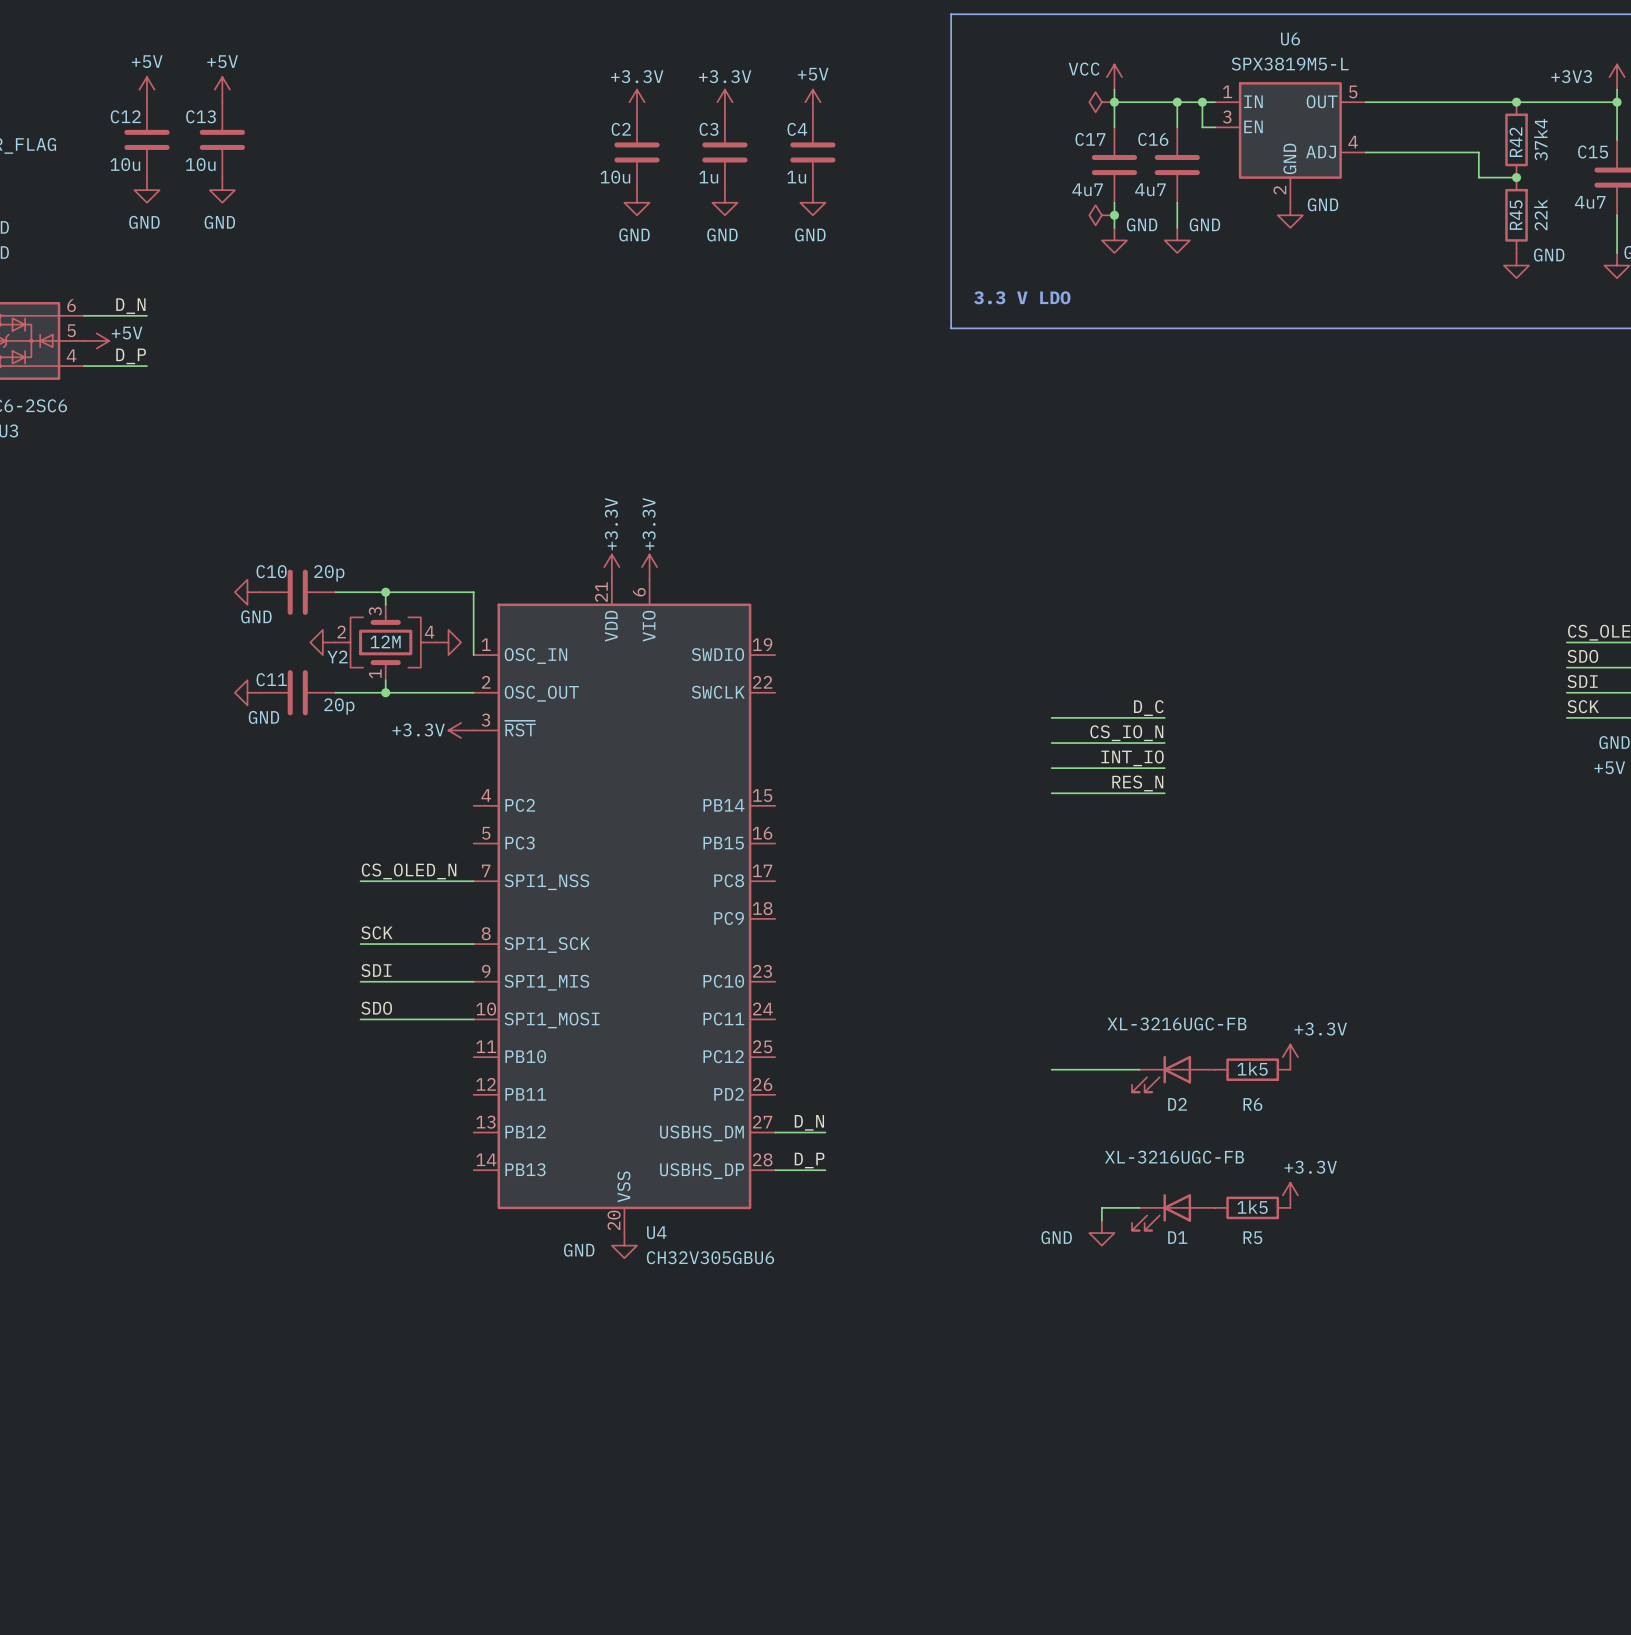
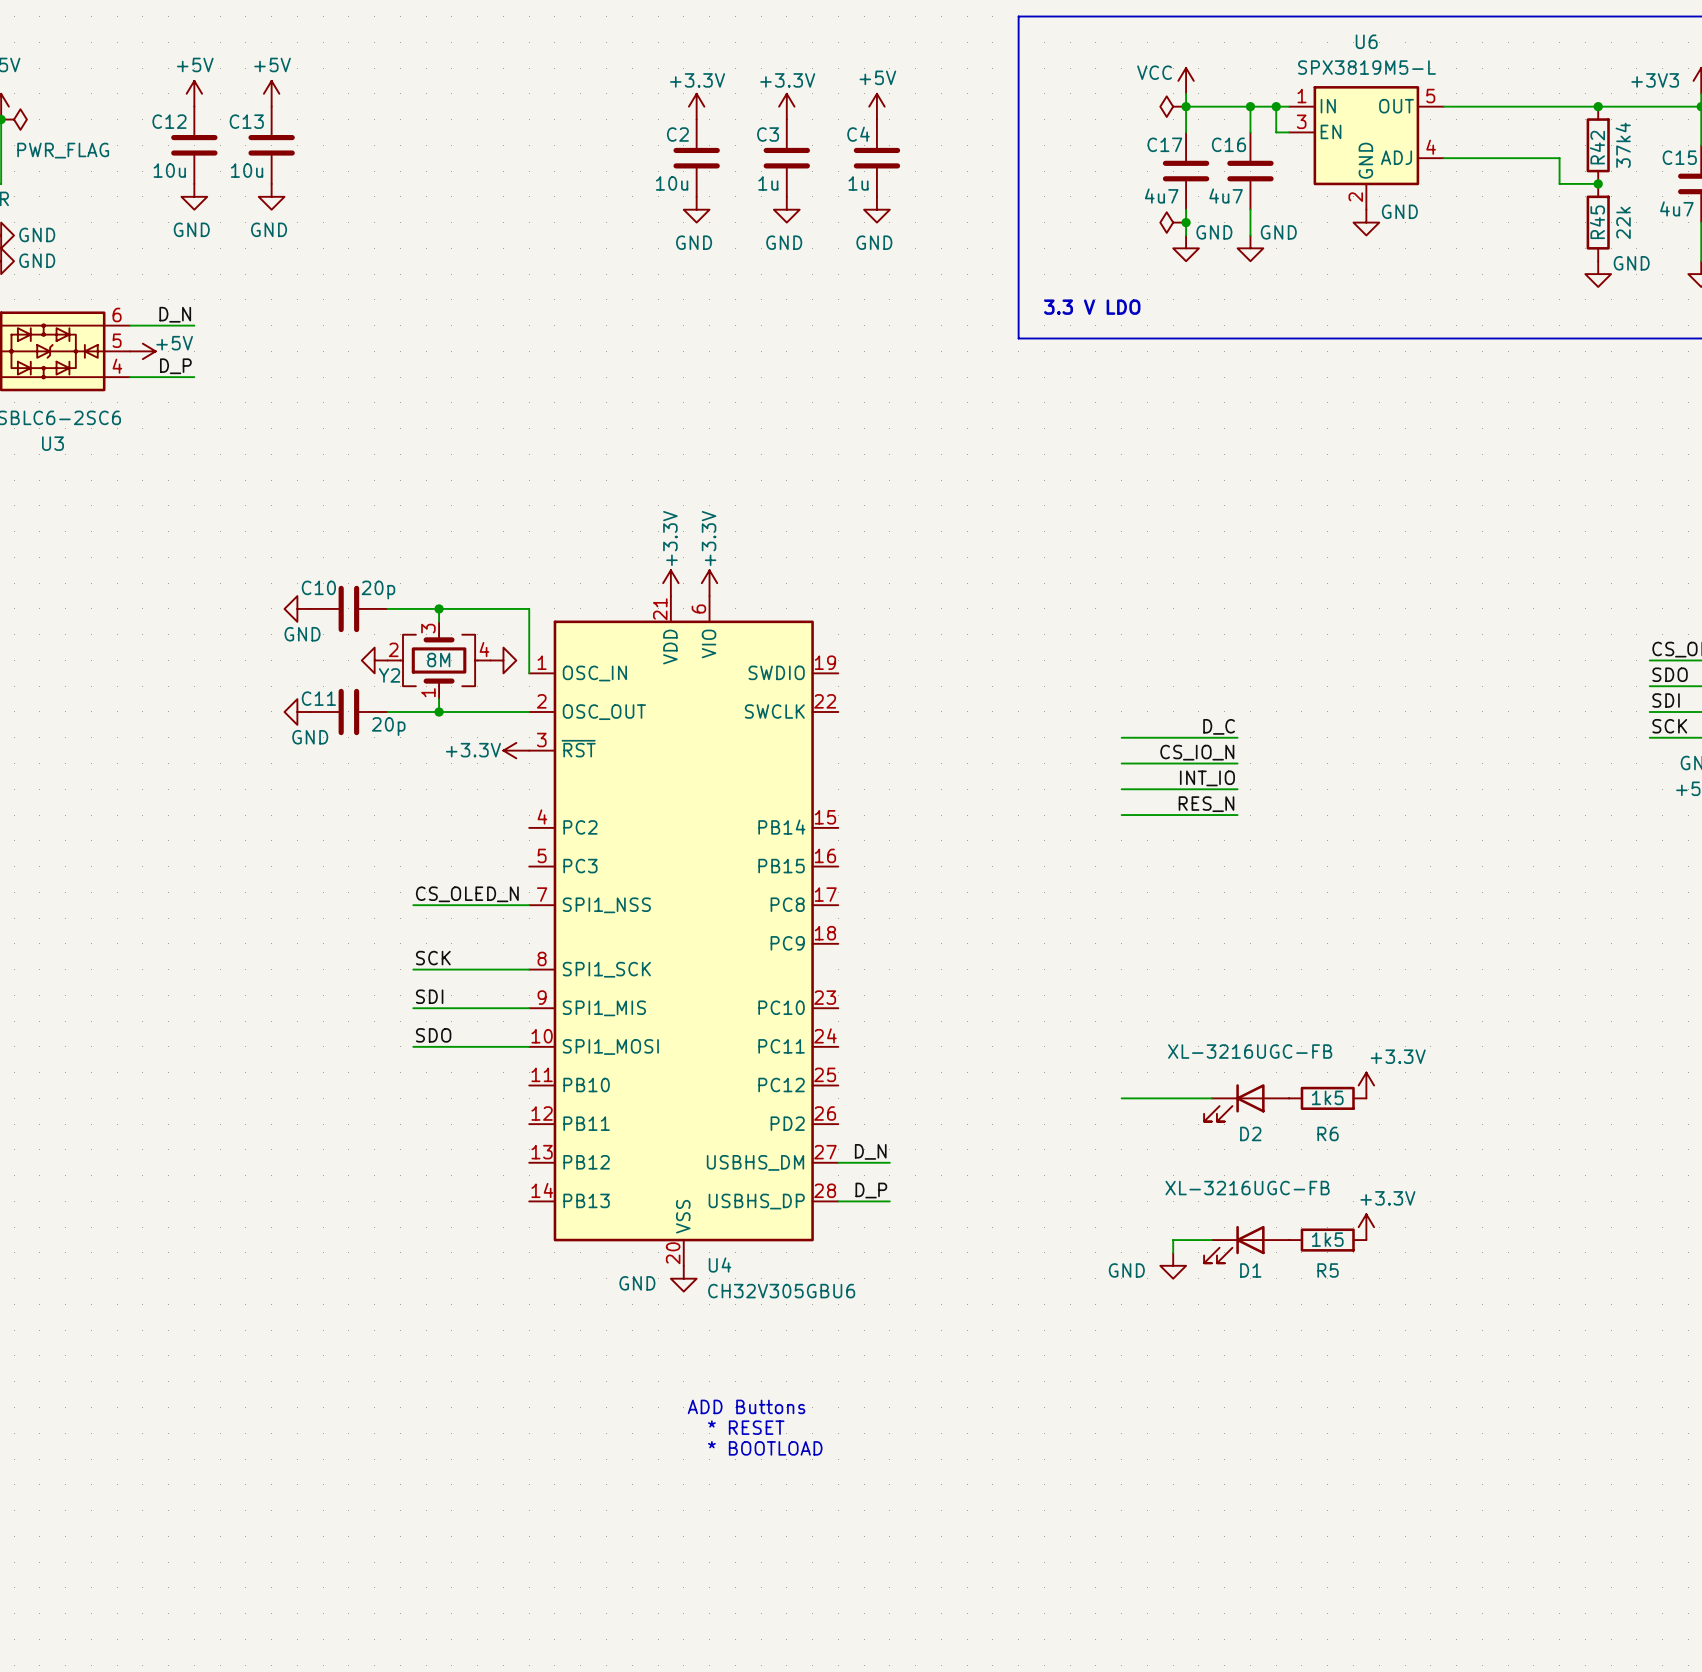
Y2 value: 12M (385, 641) -> 8M (438, 659)
text: none -> ADD Buttons (746, 1406)
text: none -> * RESET (746, 1427)
text: none -> * BOOTLOAD (765, 1448)

